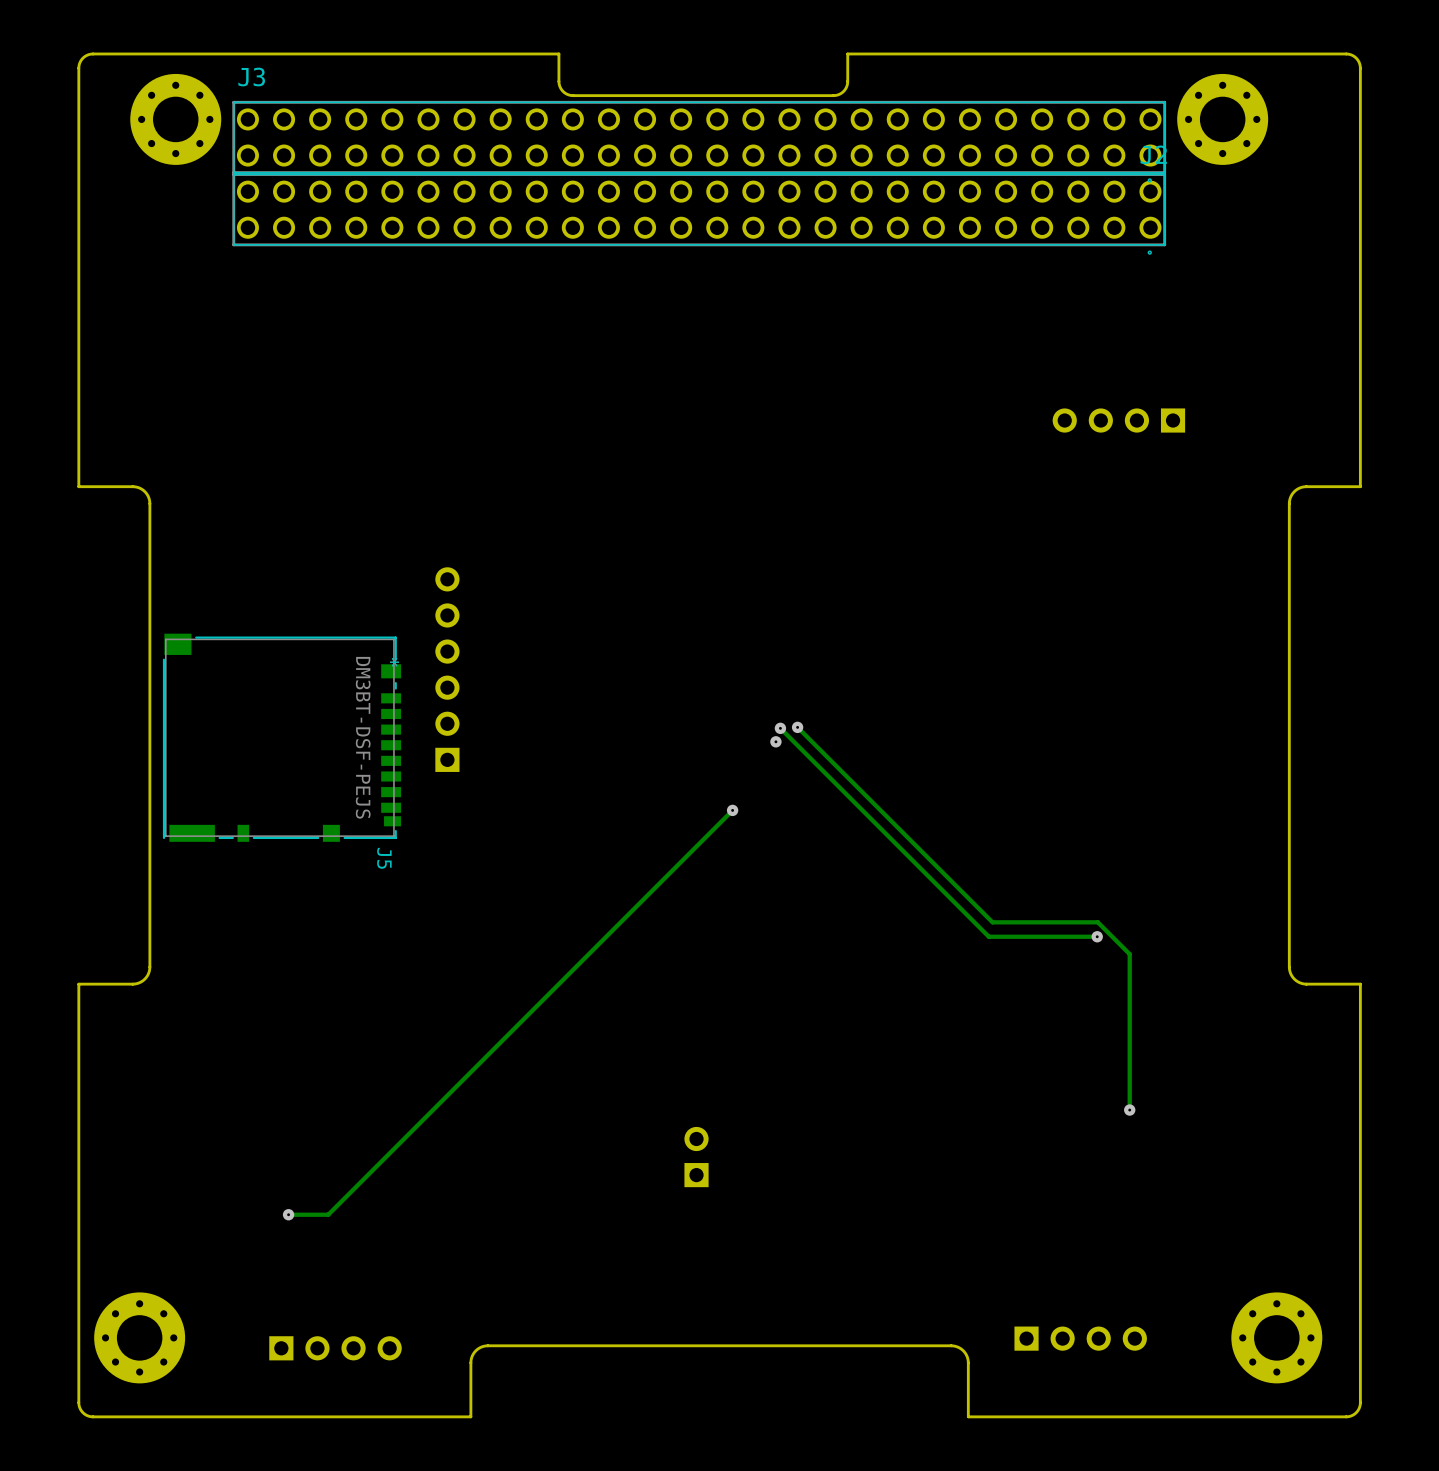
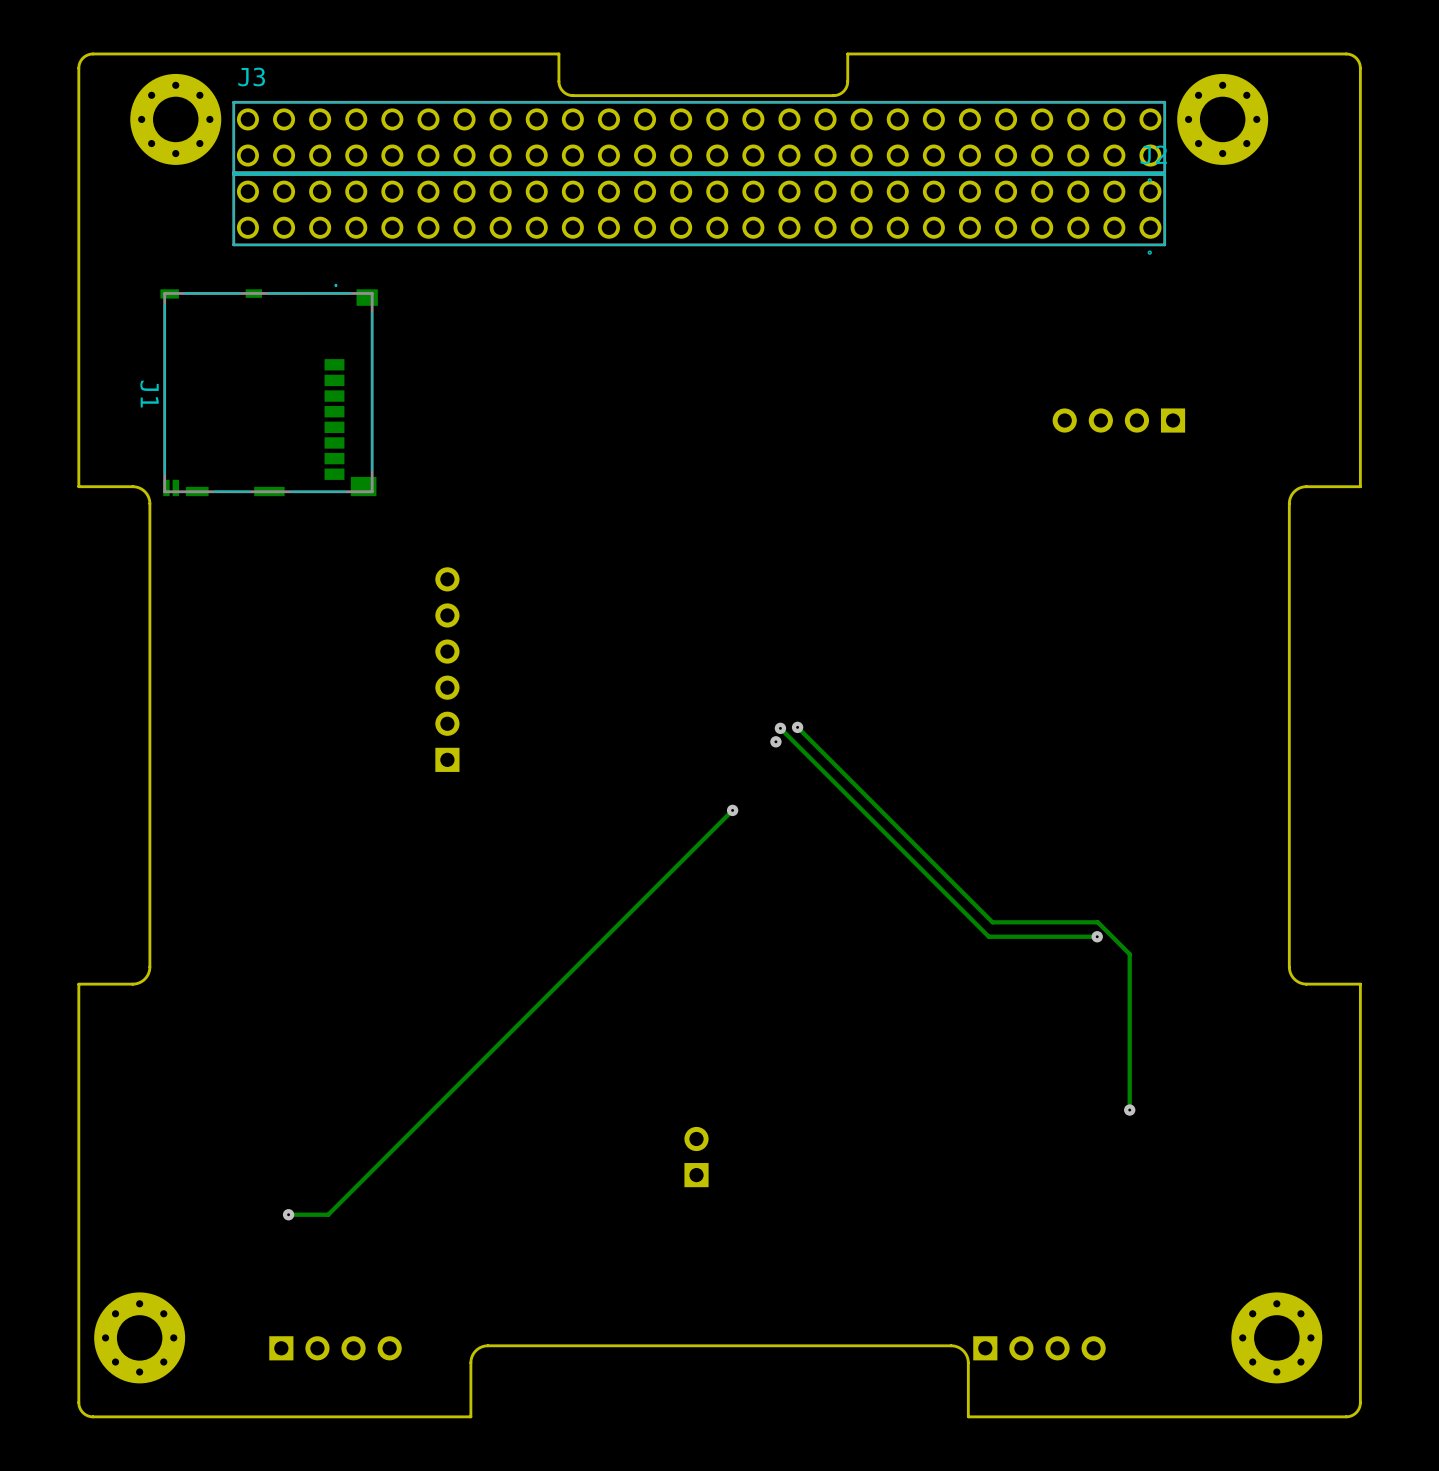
J1: none -> (269, 390)
J5: DM3BT-DSF-PEJS (281, 737) -> none
part position: (1080, 1338) -> (1039, 1348)

